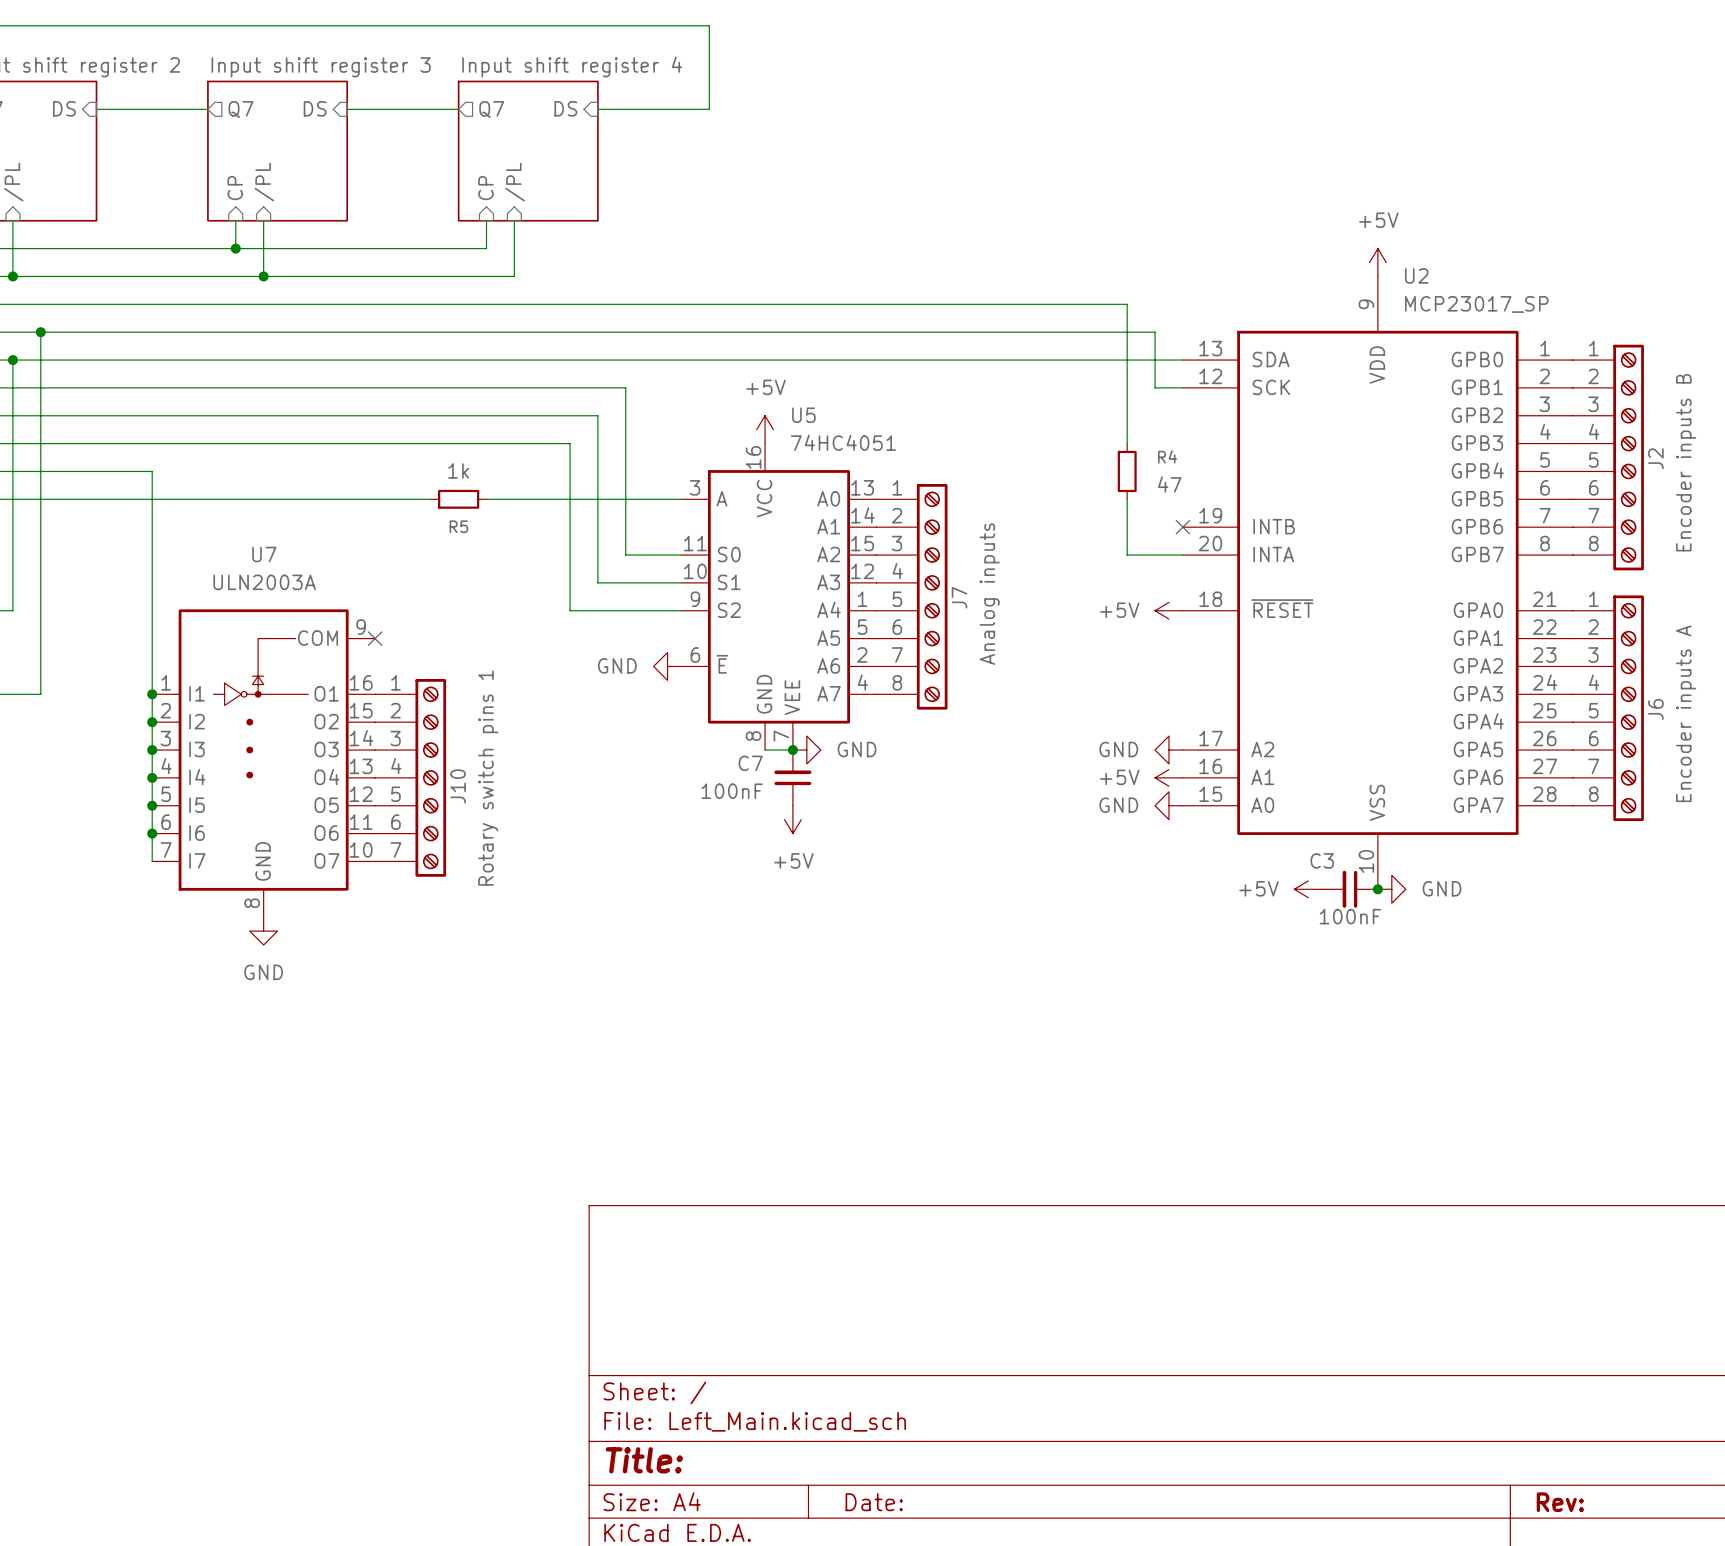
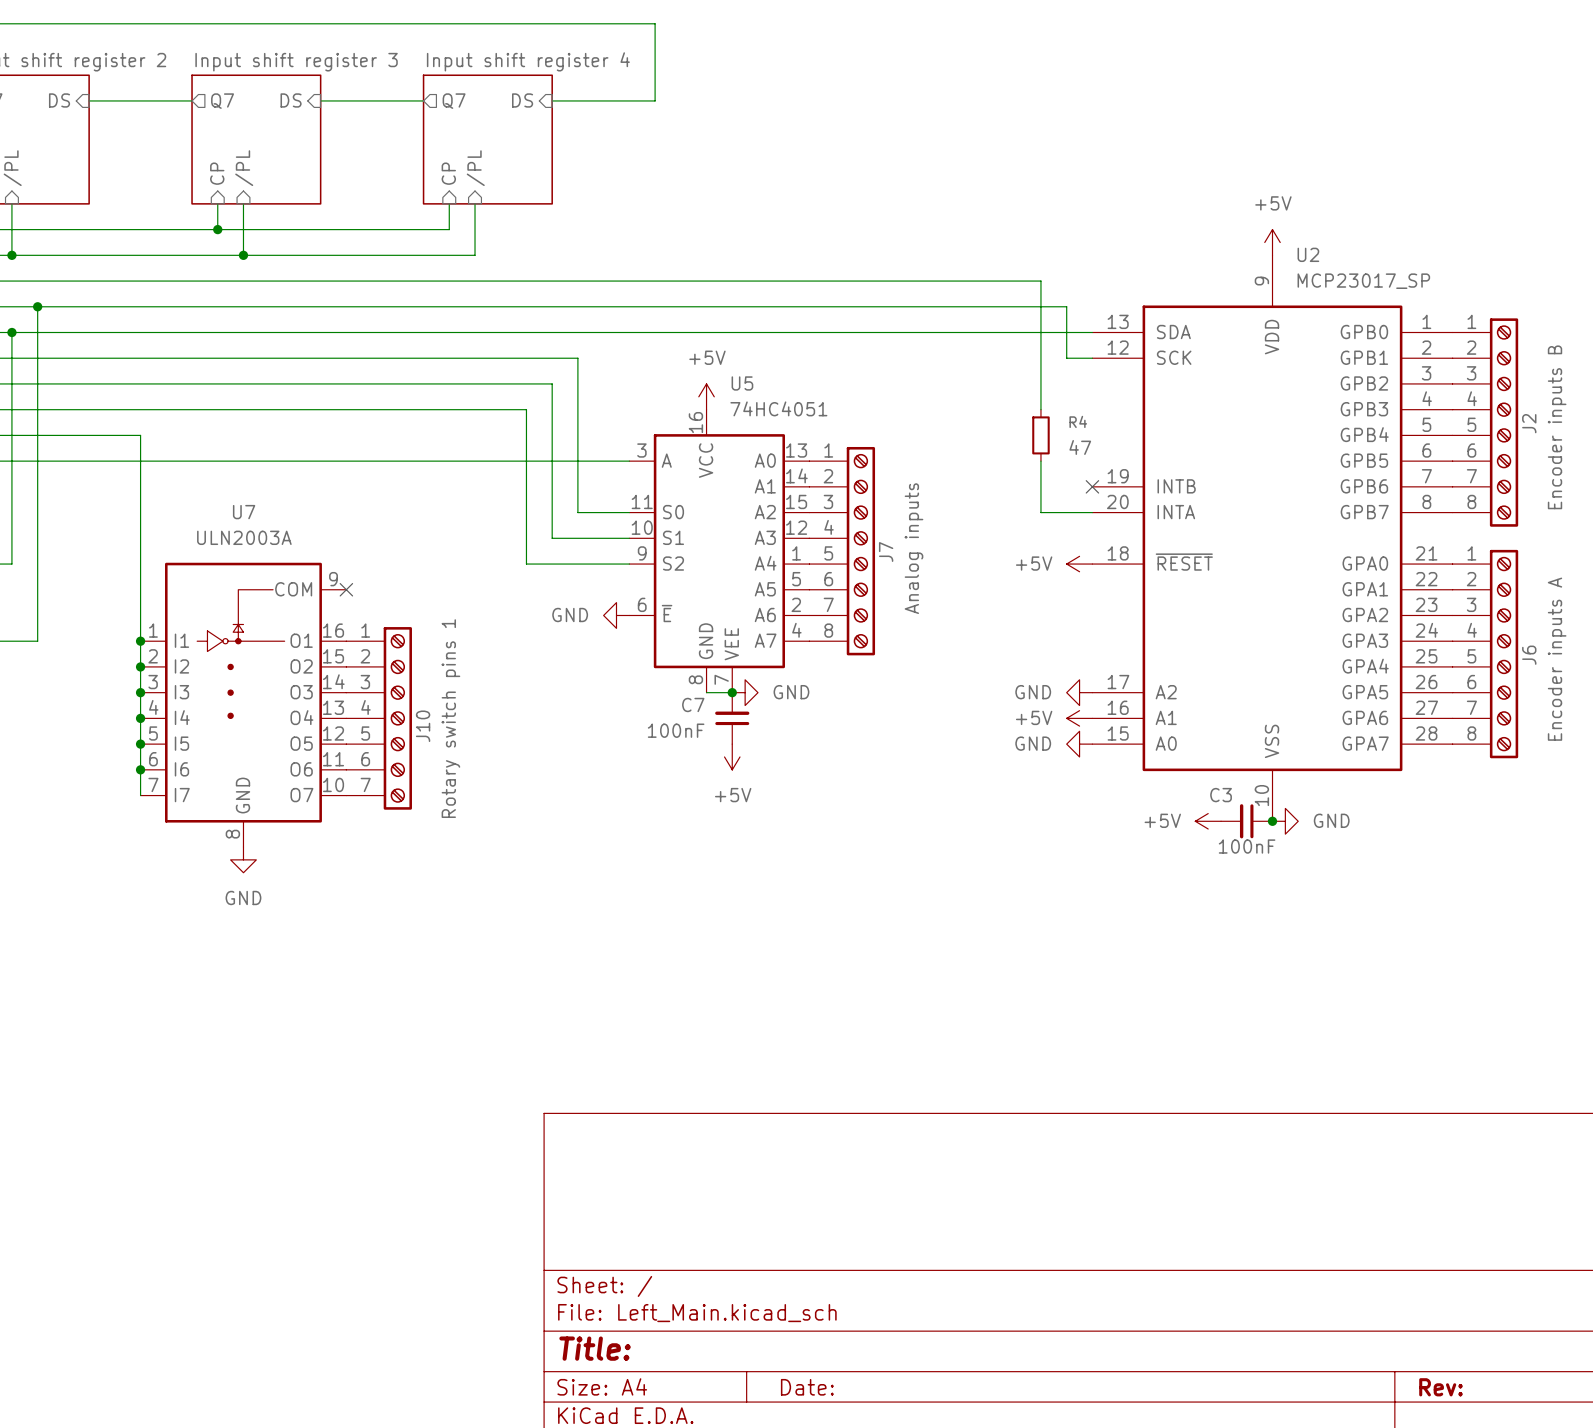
wire: none -> (397, 461) (449, 461)
R5: 1k (458, 499) -> none

